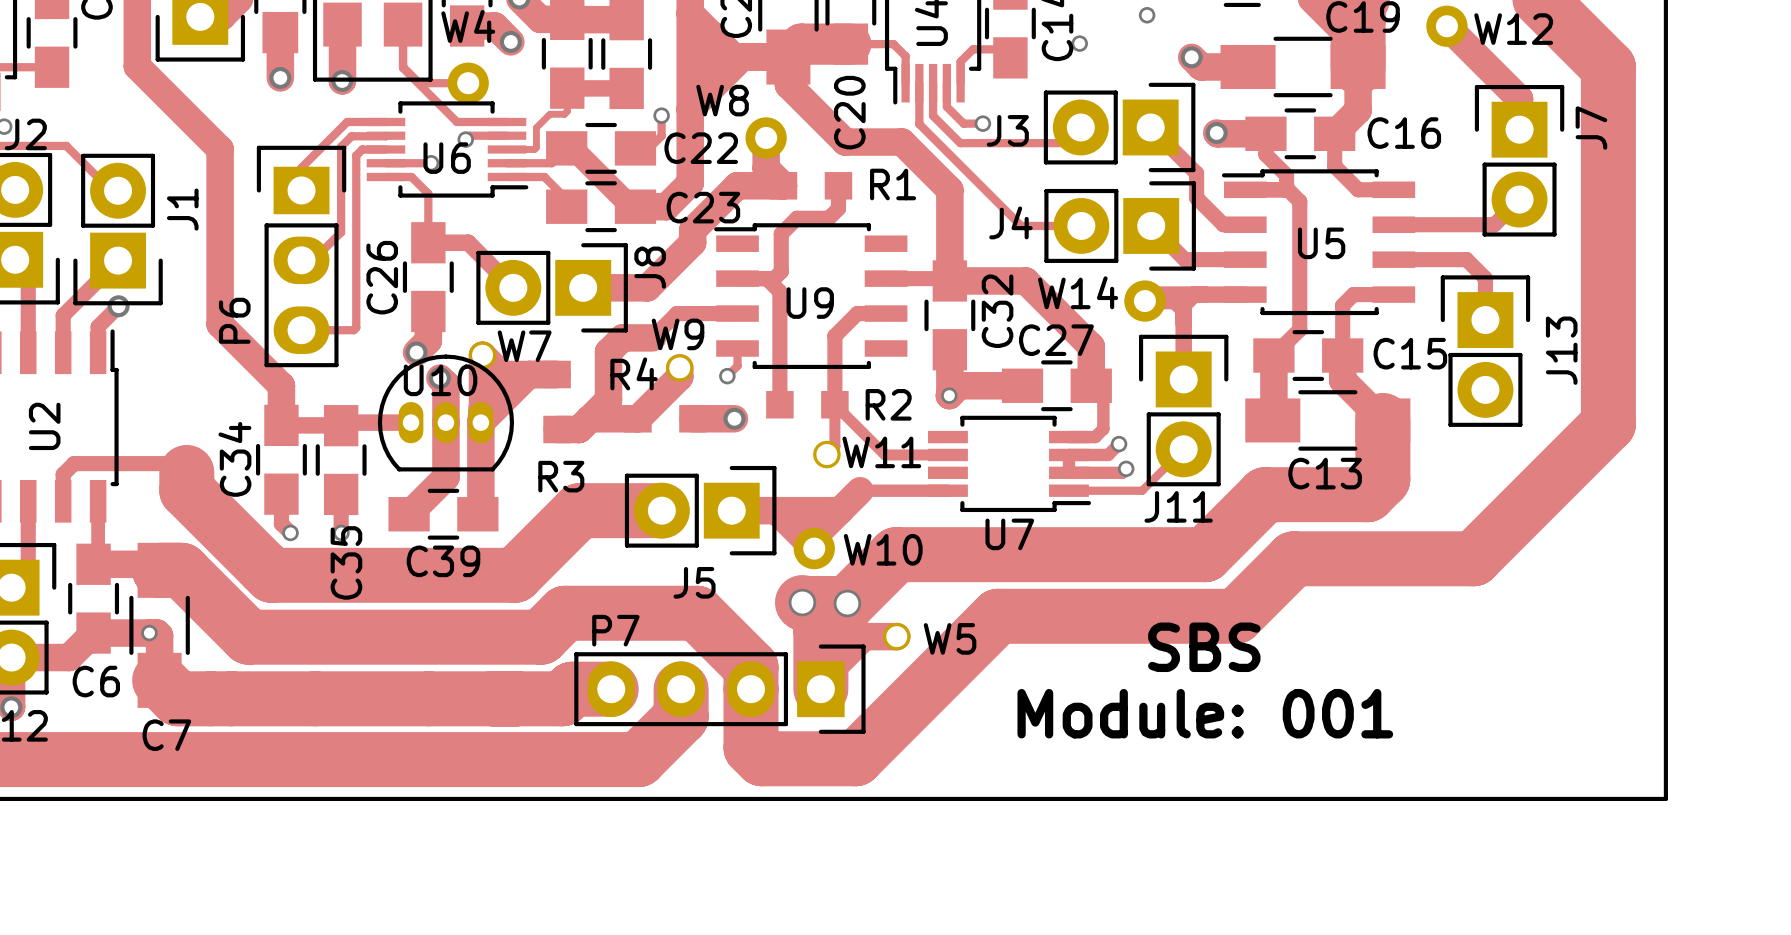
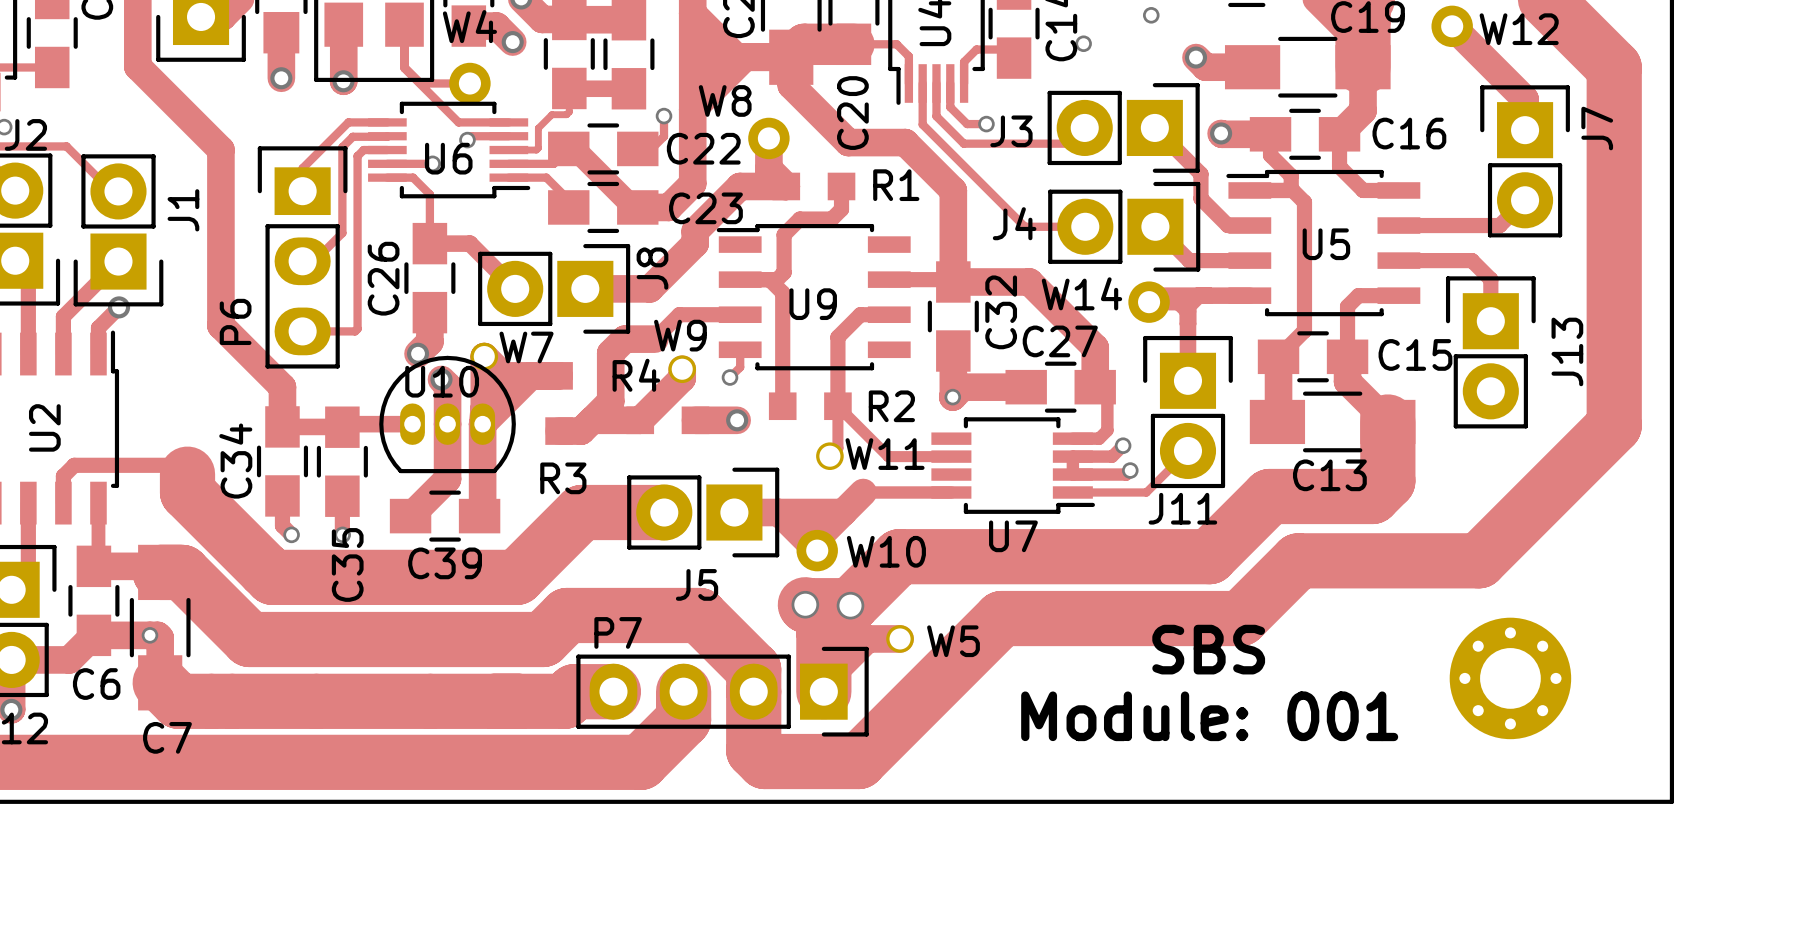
part: none -> (1510, 678)

